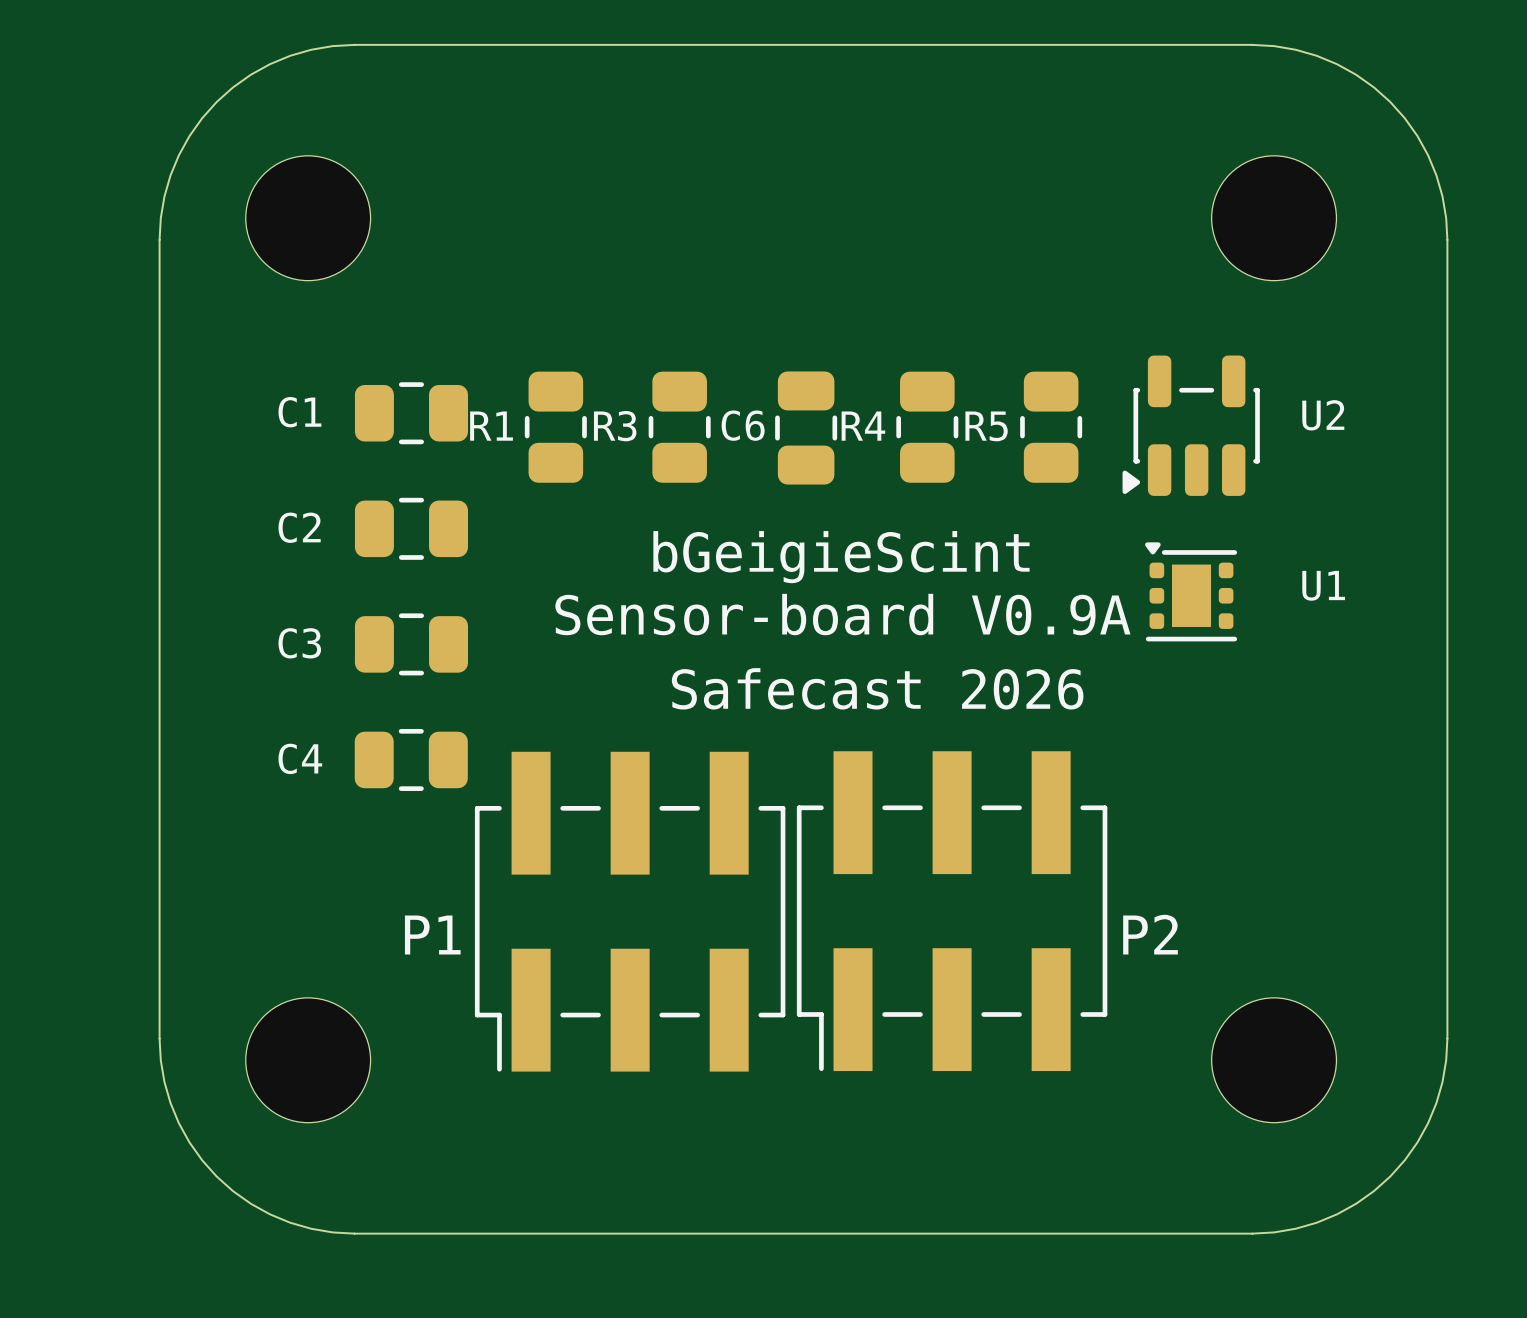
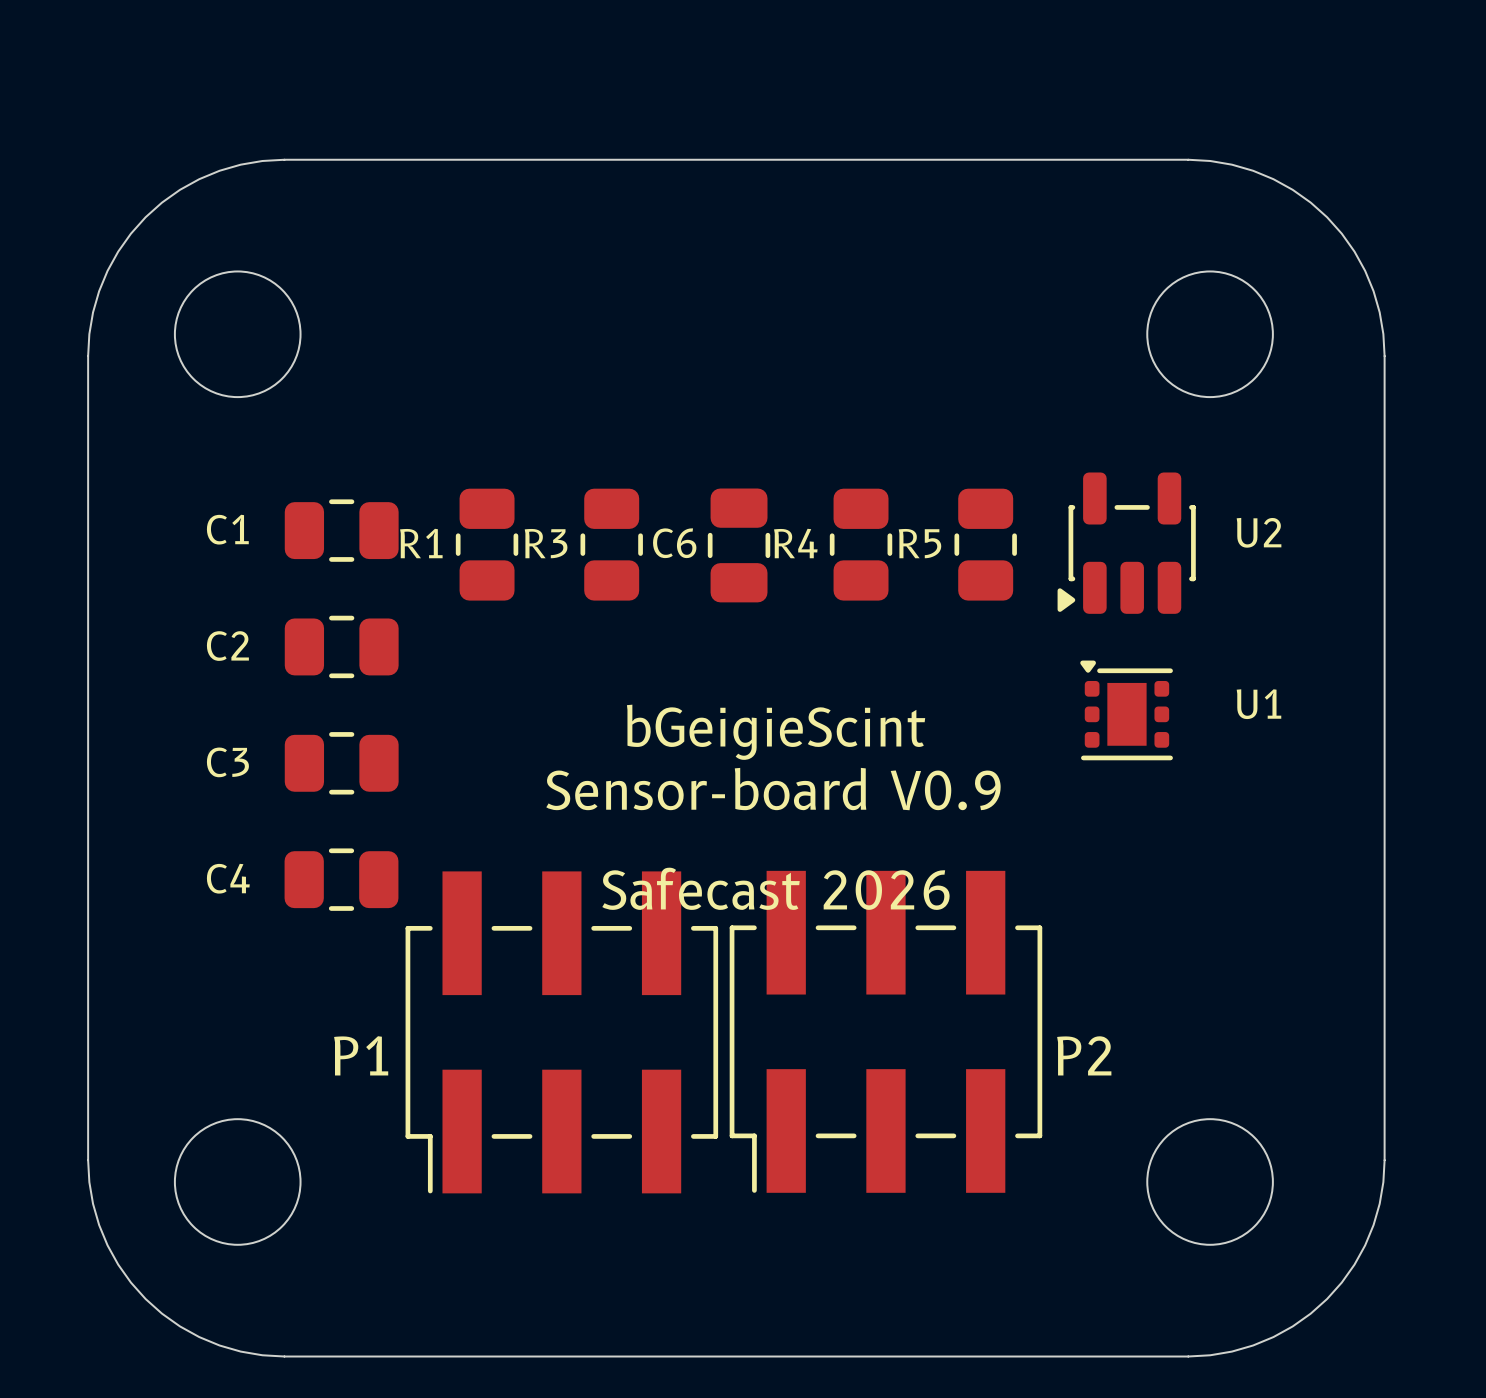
text position: bGeigieScint (841, 557) -> bGeigieScint (776, 732)
text: Sensor-board V0.9A (842, 614) -> Sensor-board V0.9 (773, 789)
text position: Safecast 2026 (877, 688) -> Safecast 2026 (775, 888)

